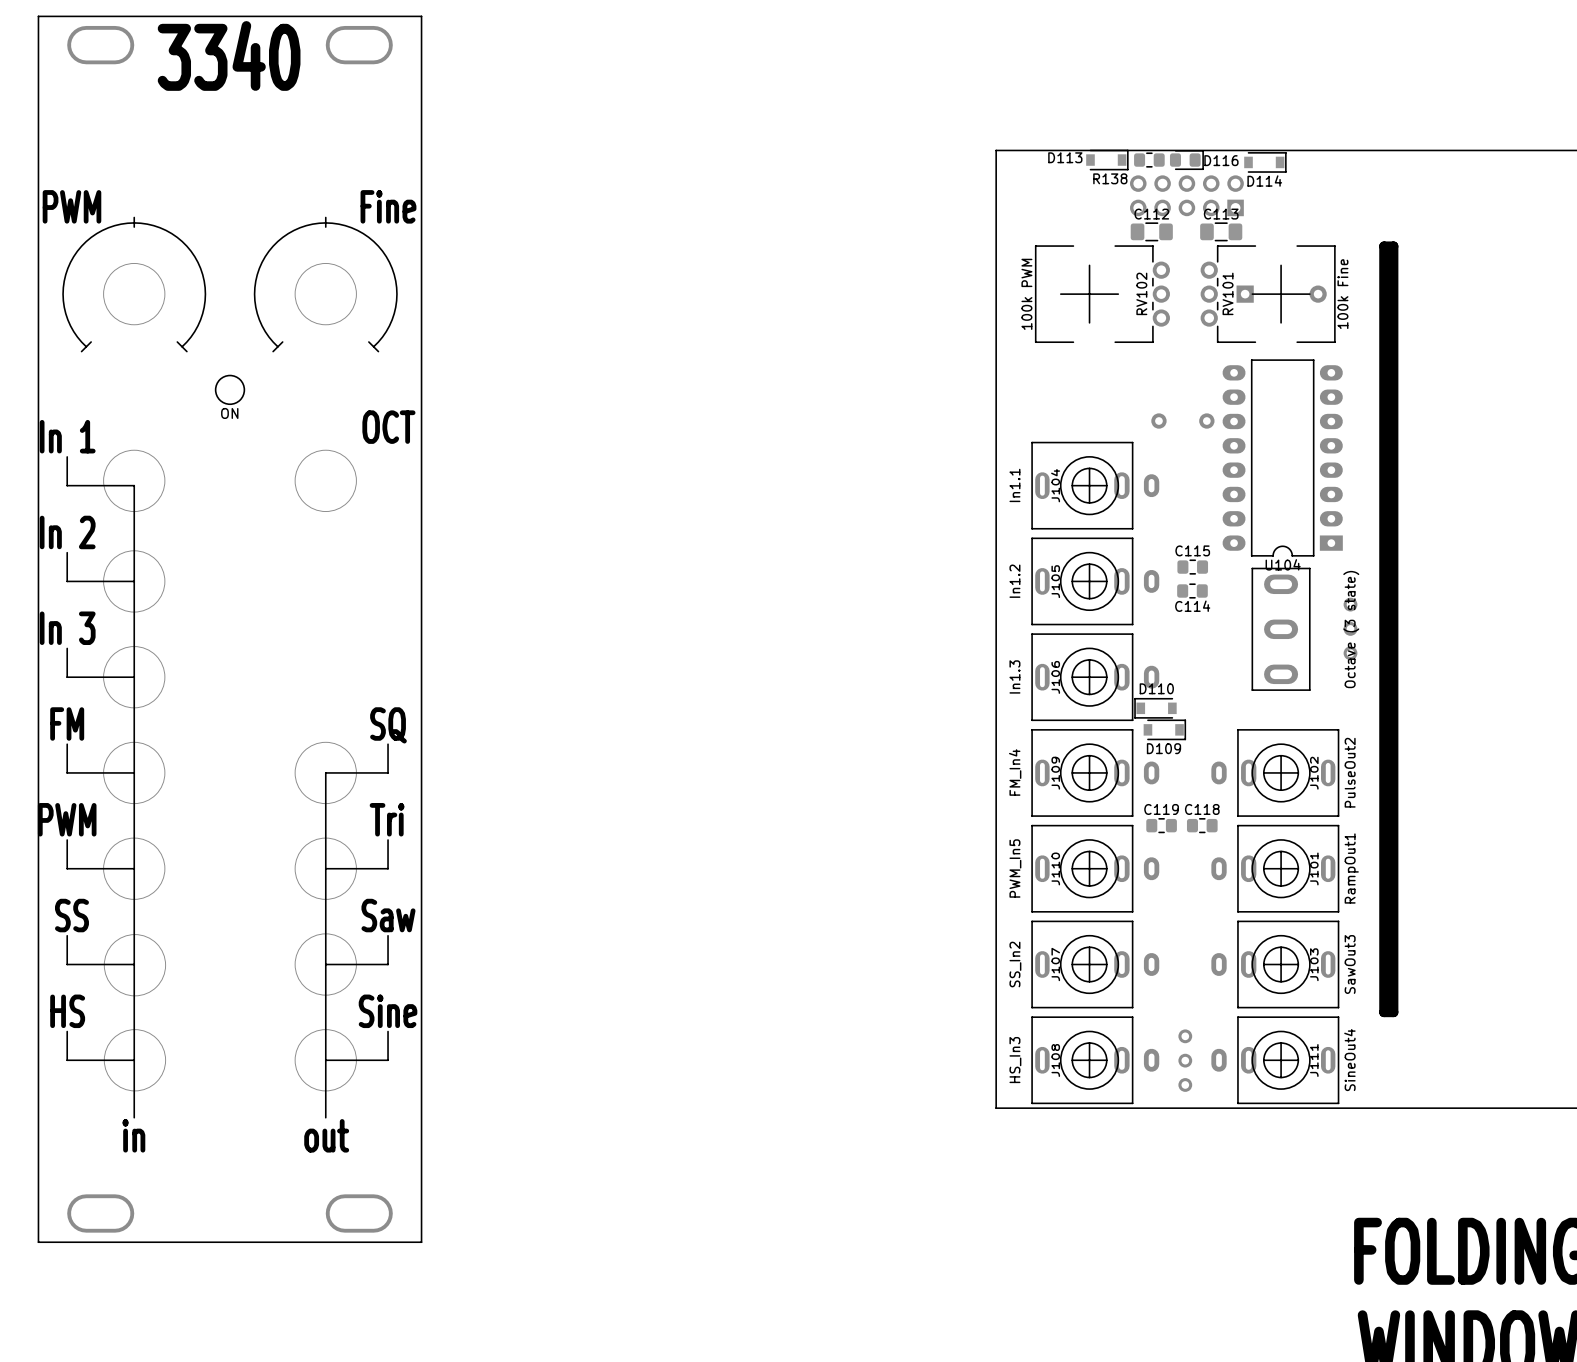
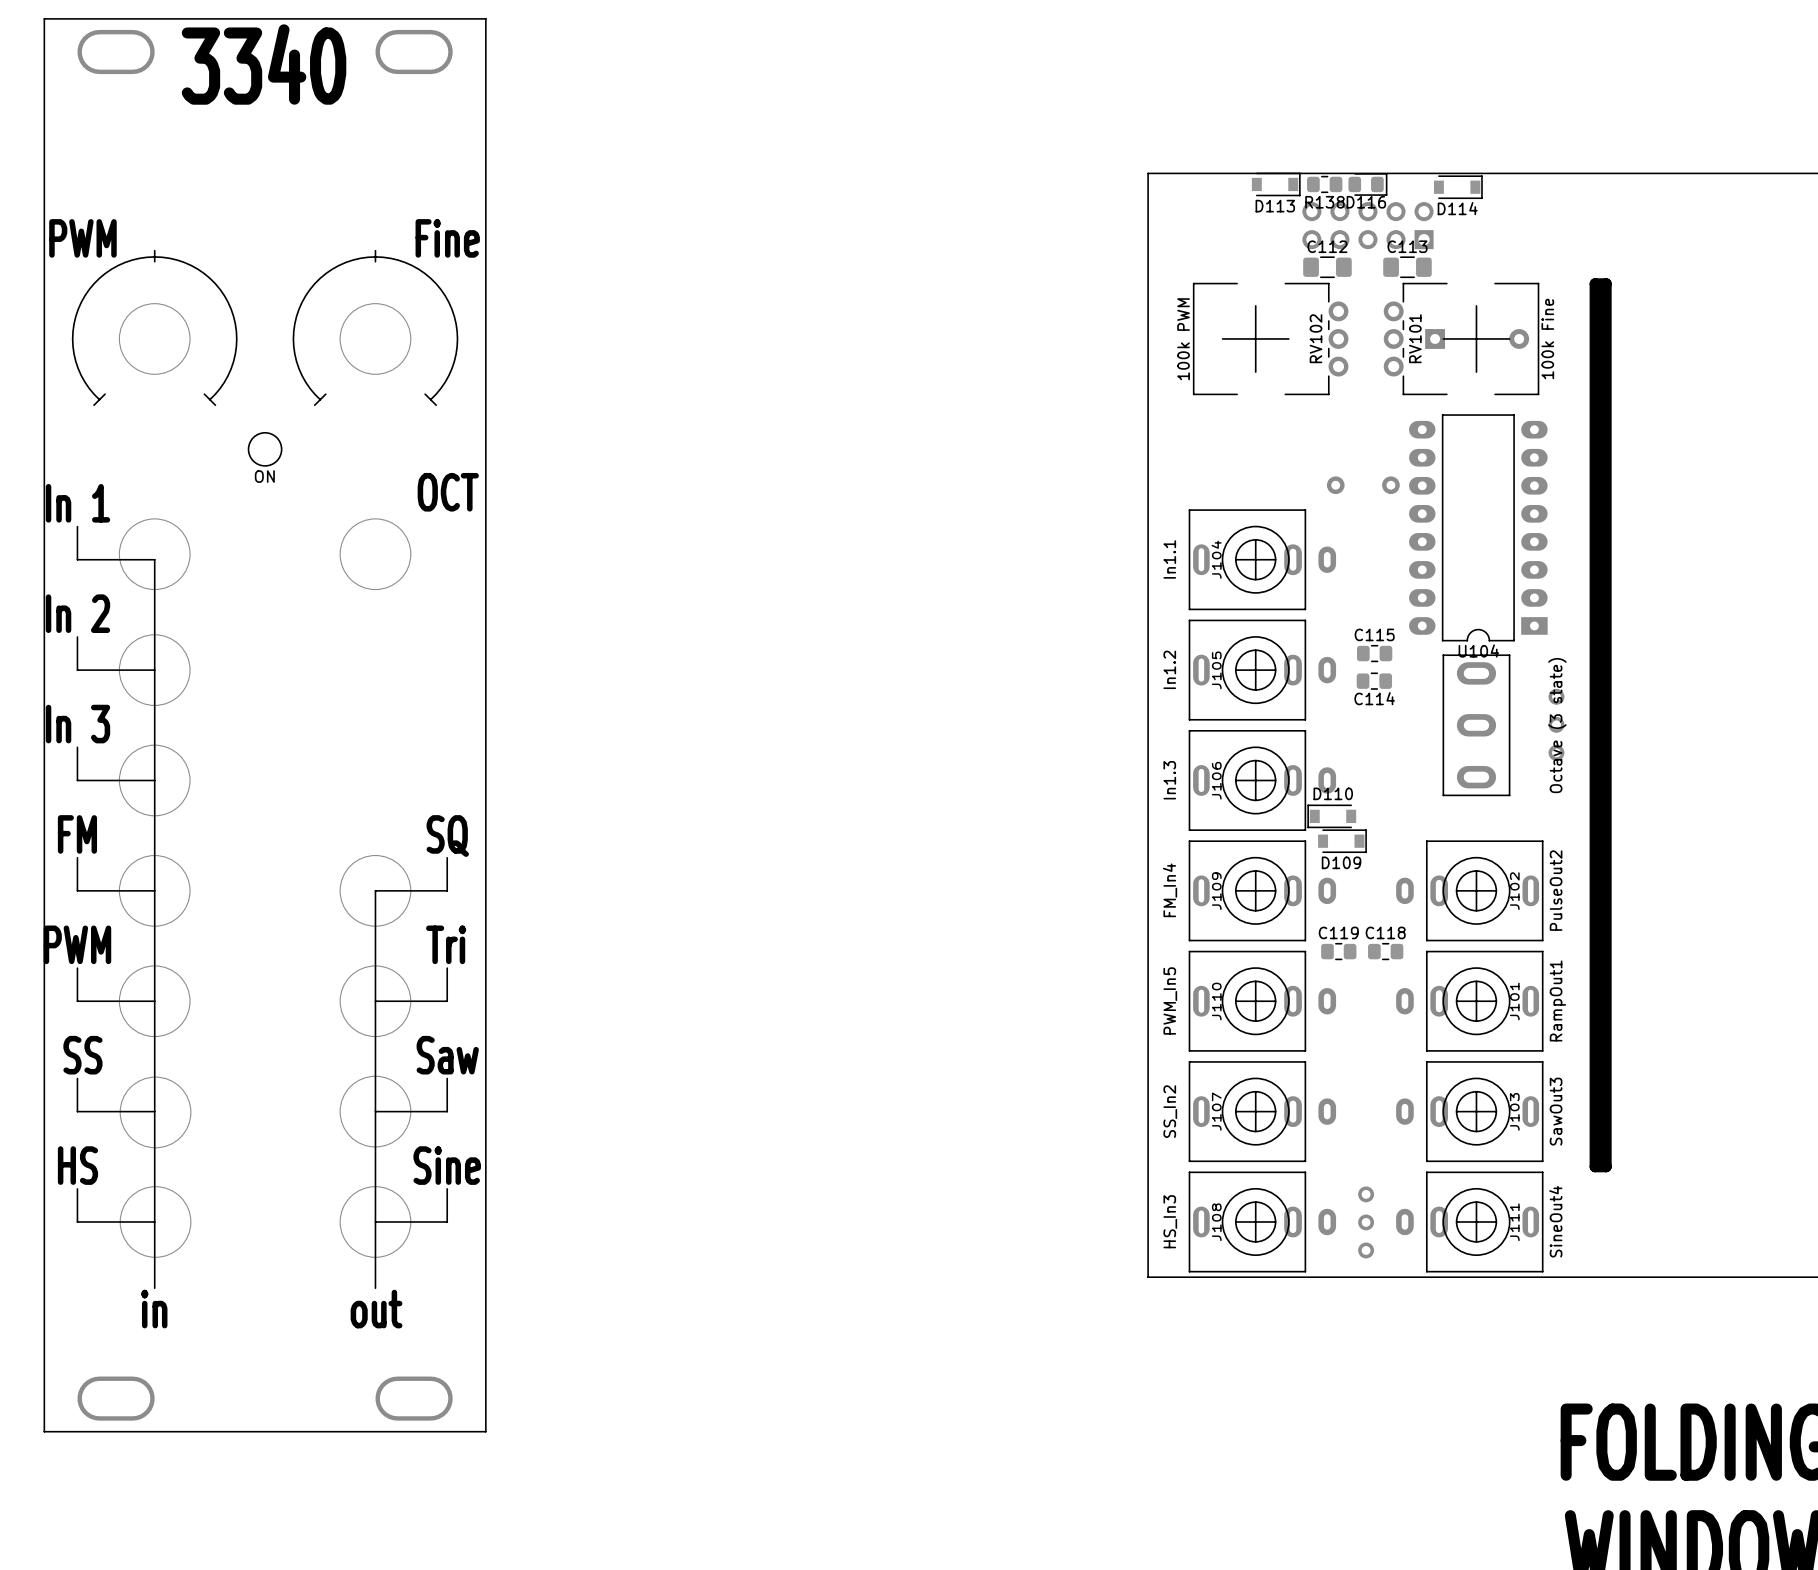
D113 name position: D113 (1065, 157) -> D113 (1275, 206)
D116 name position: D116 (1221, 160) -> D116 (1366, 202)
R138 name position: R138 (1110, 178) -> R138 (1324, 202)

